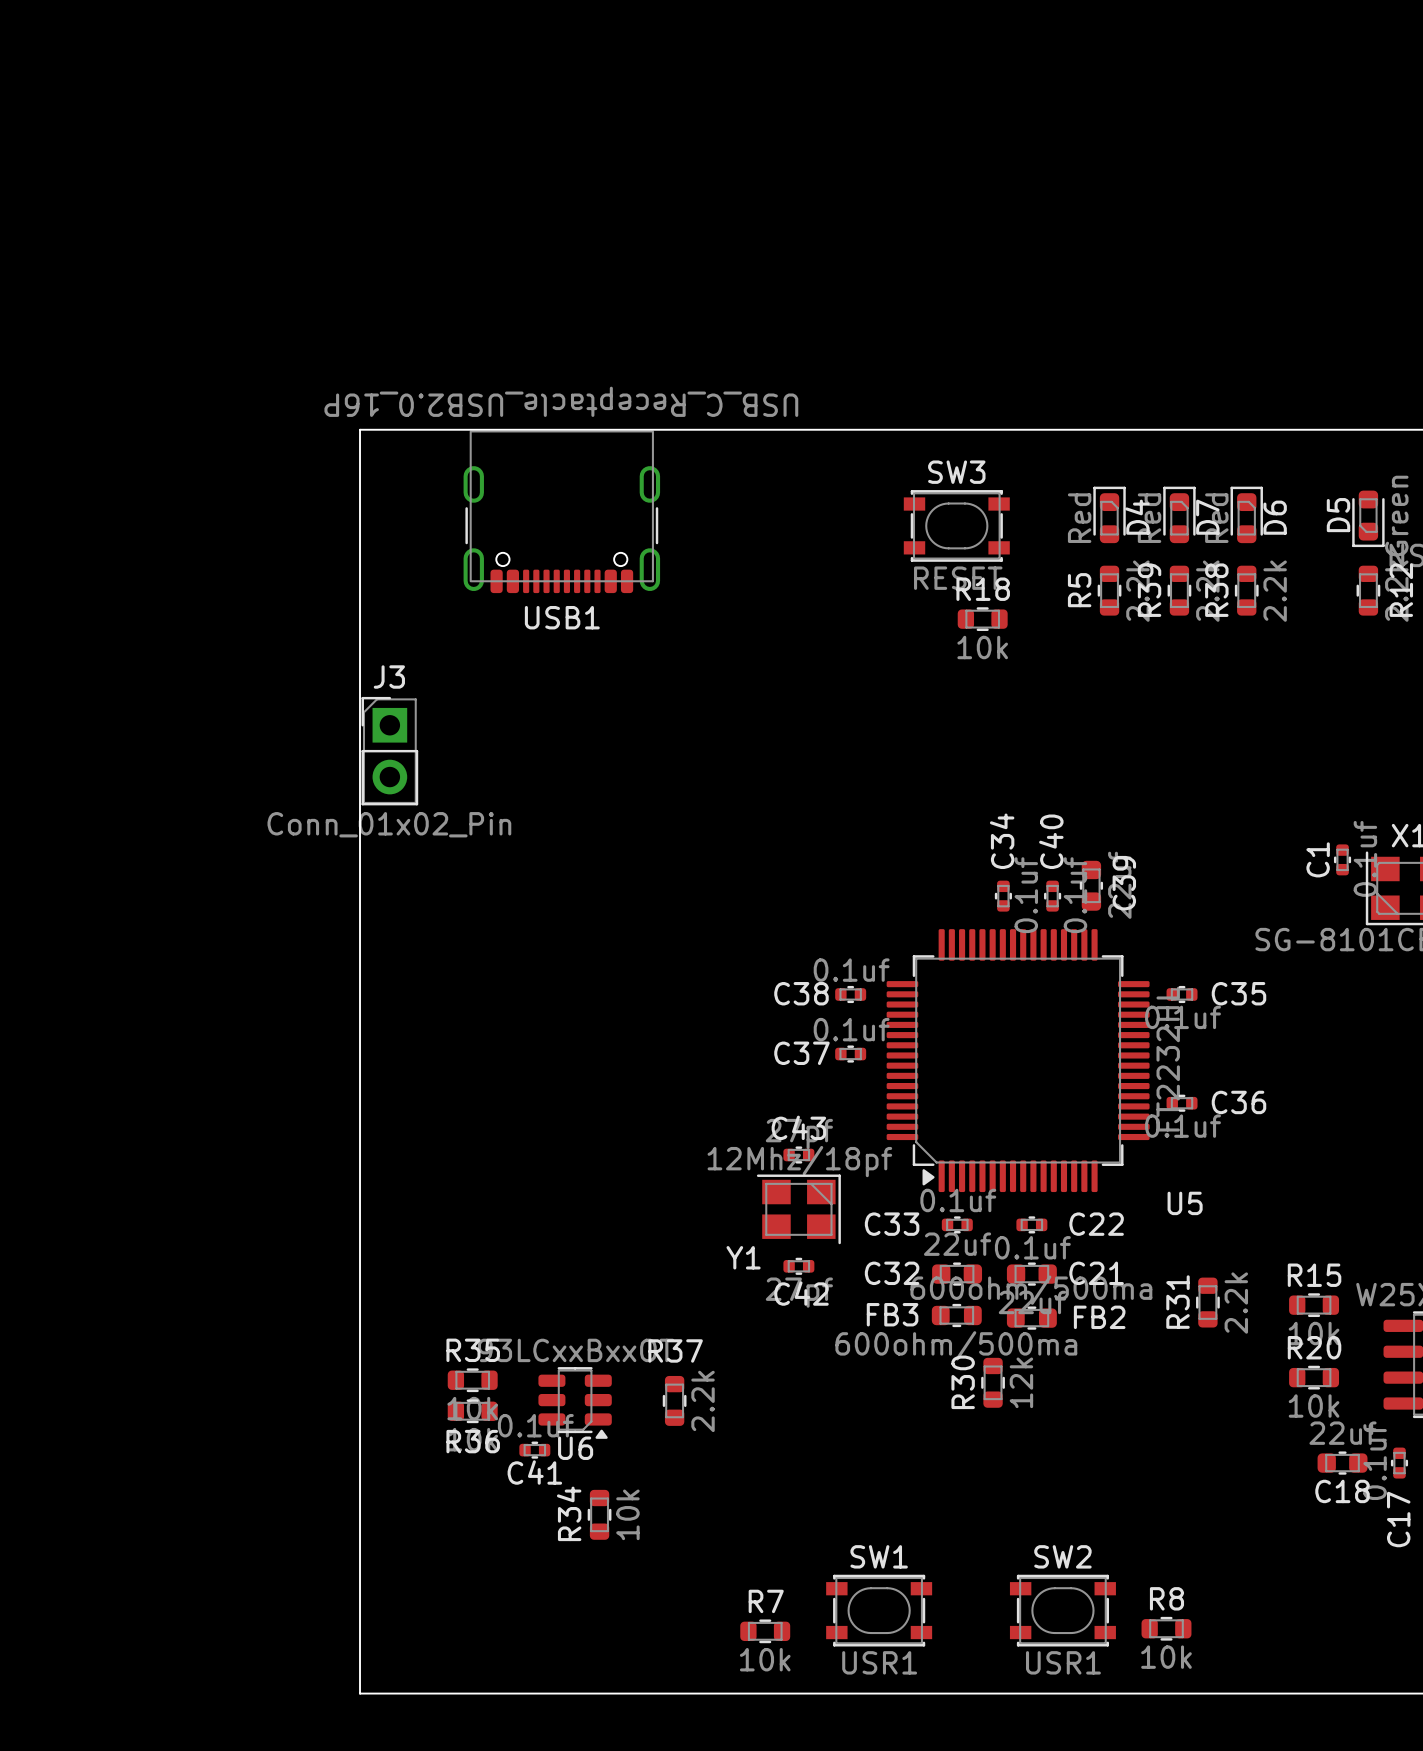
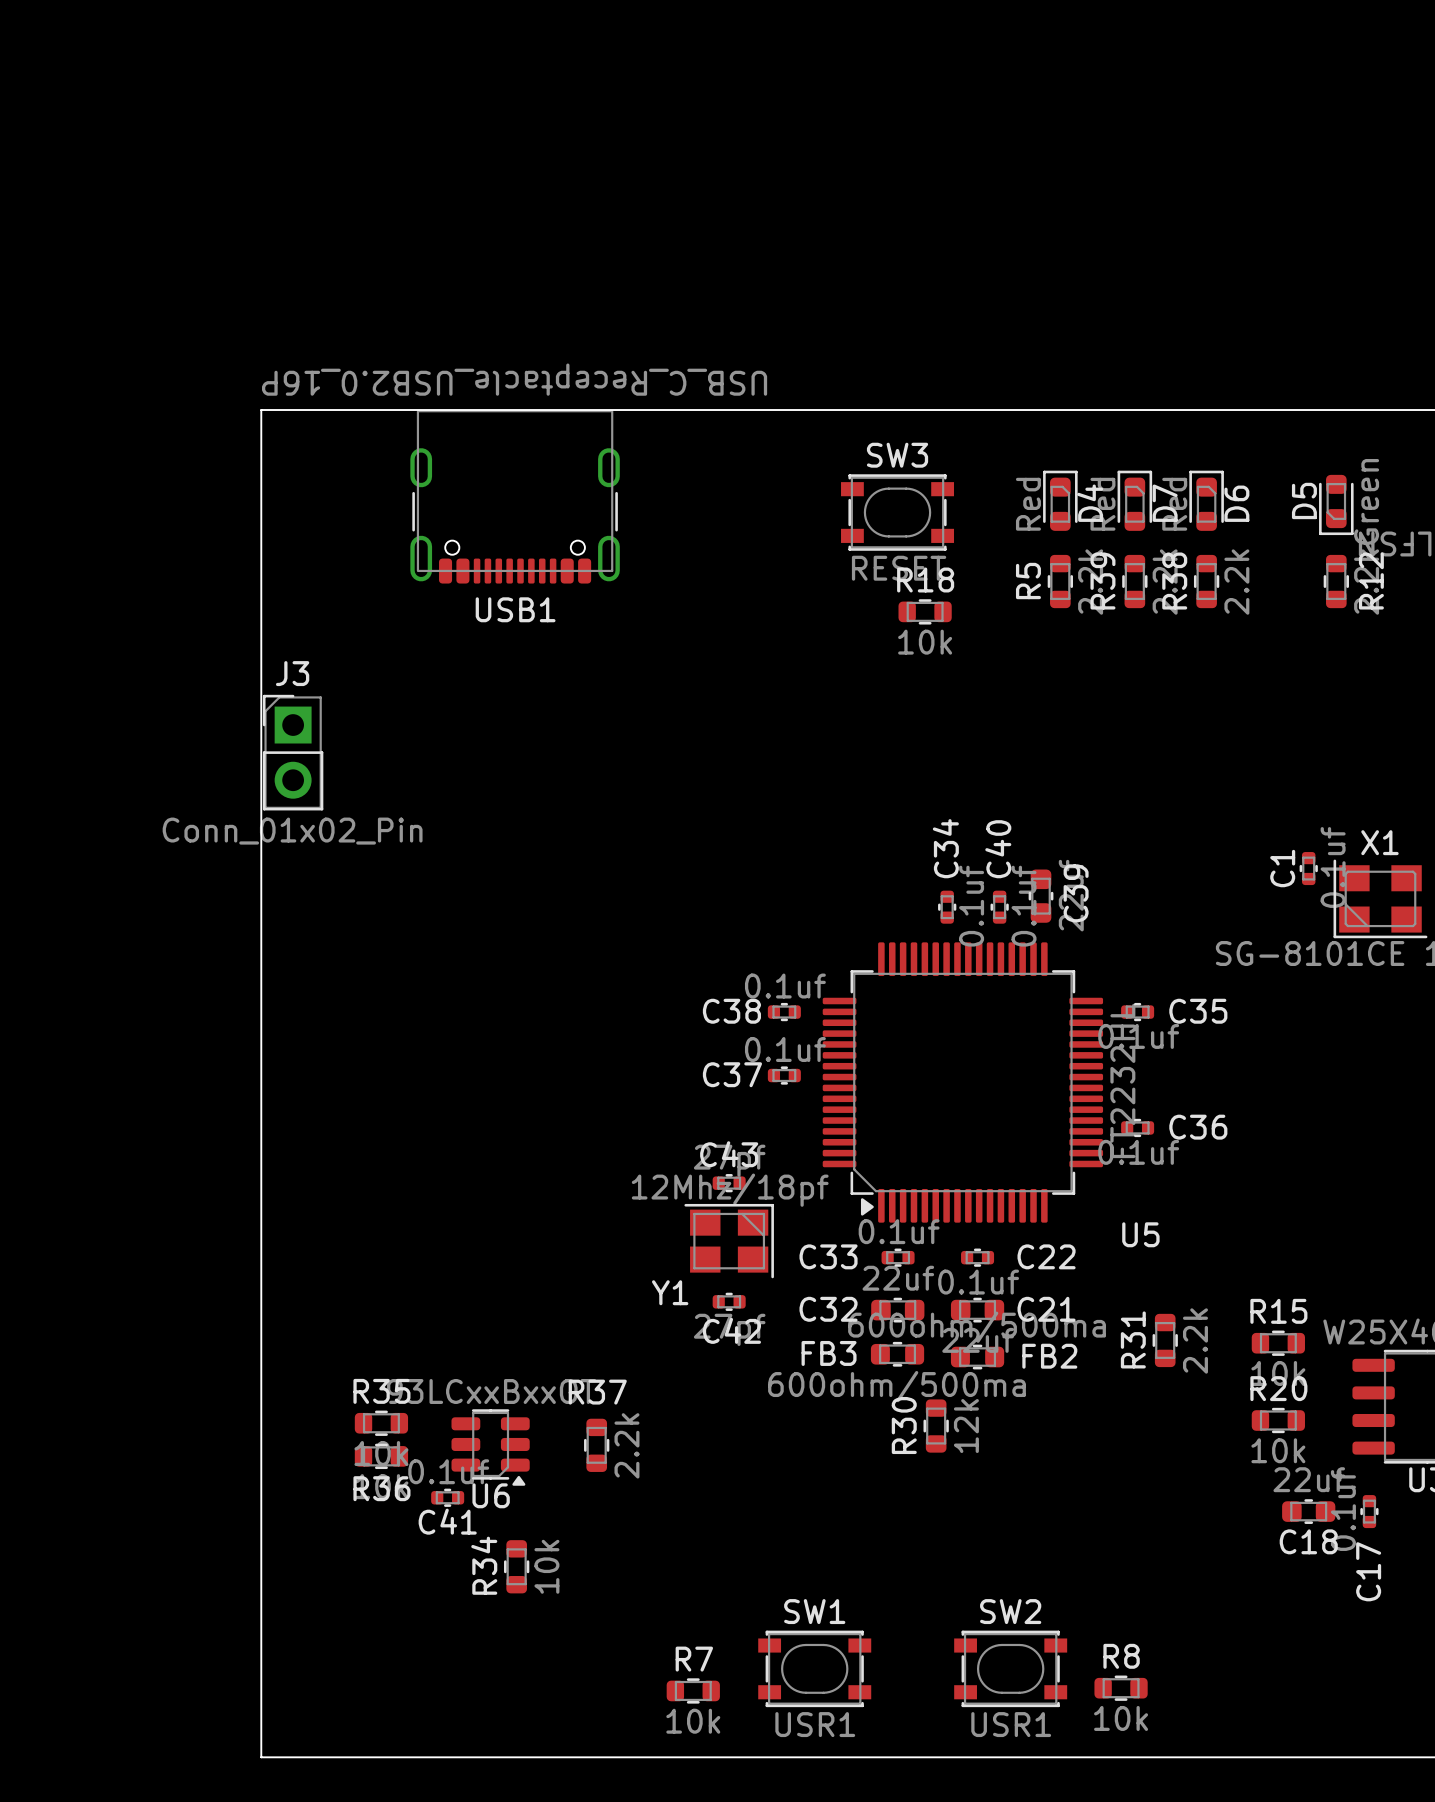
USB1 position: (561, 511) -> (515, 496)

